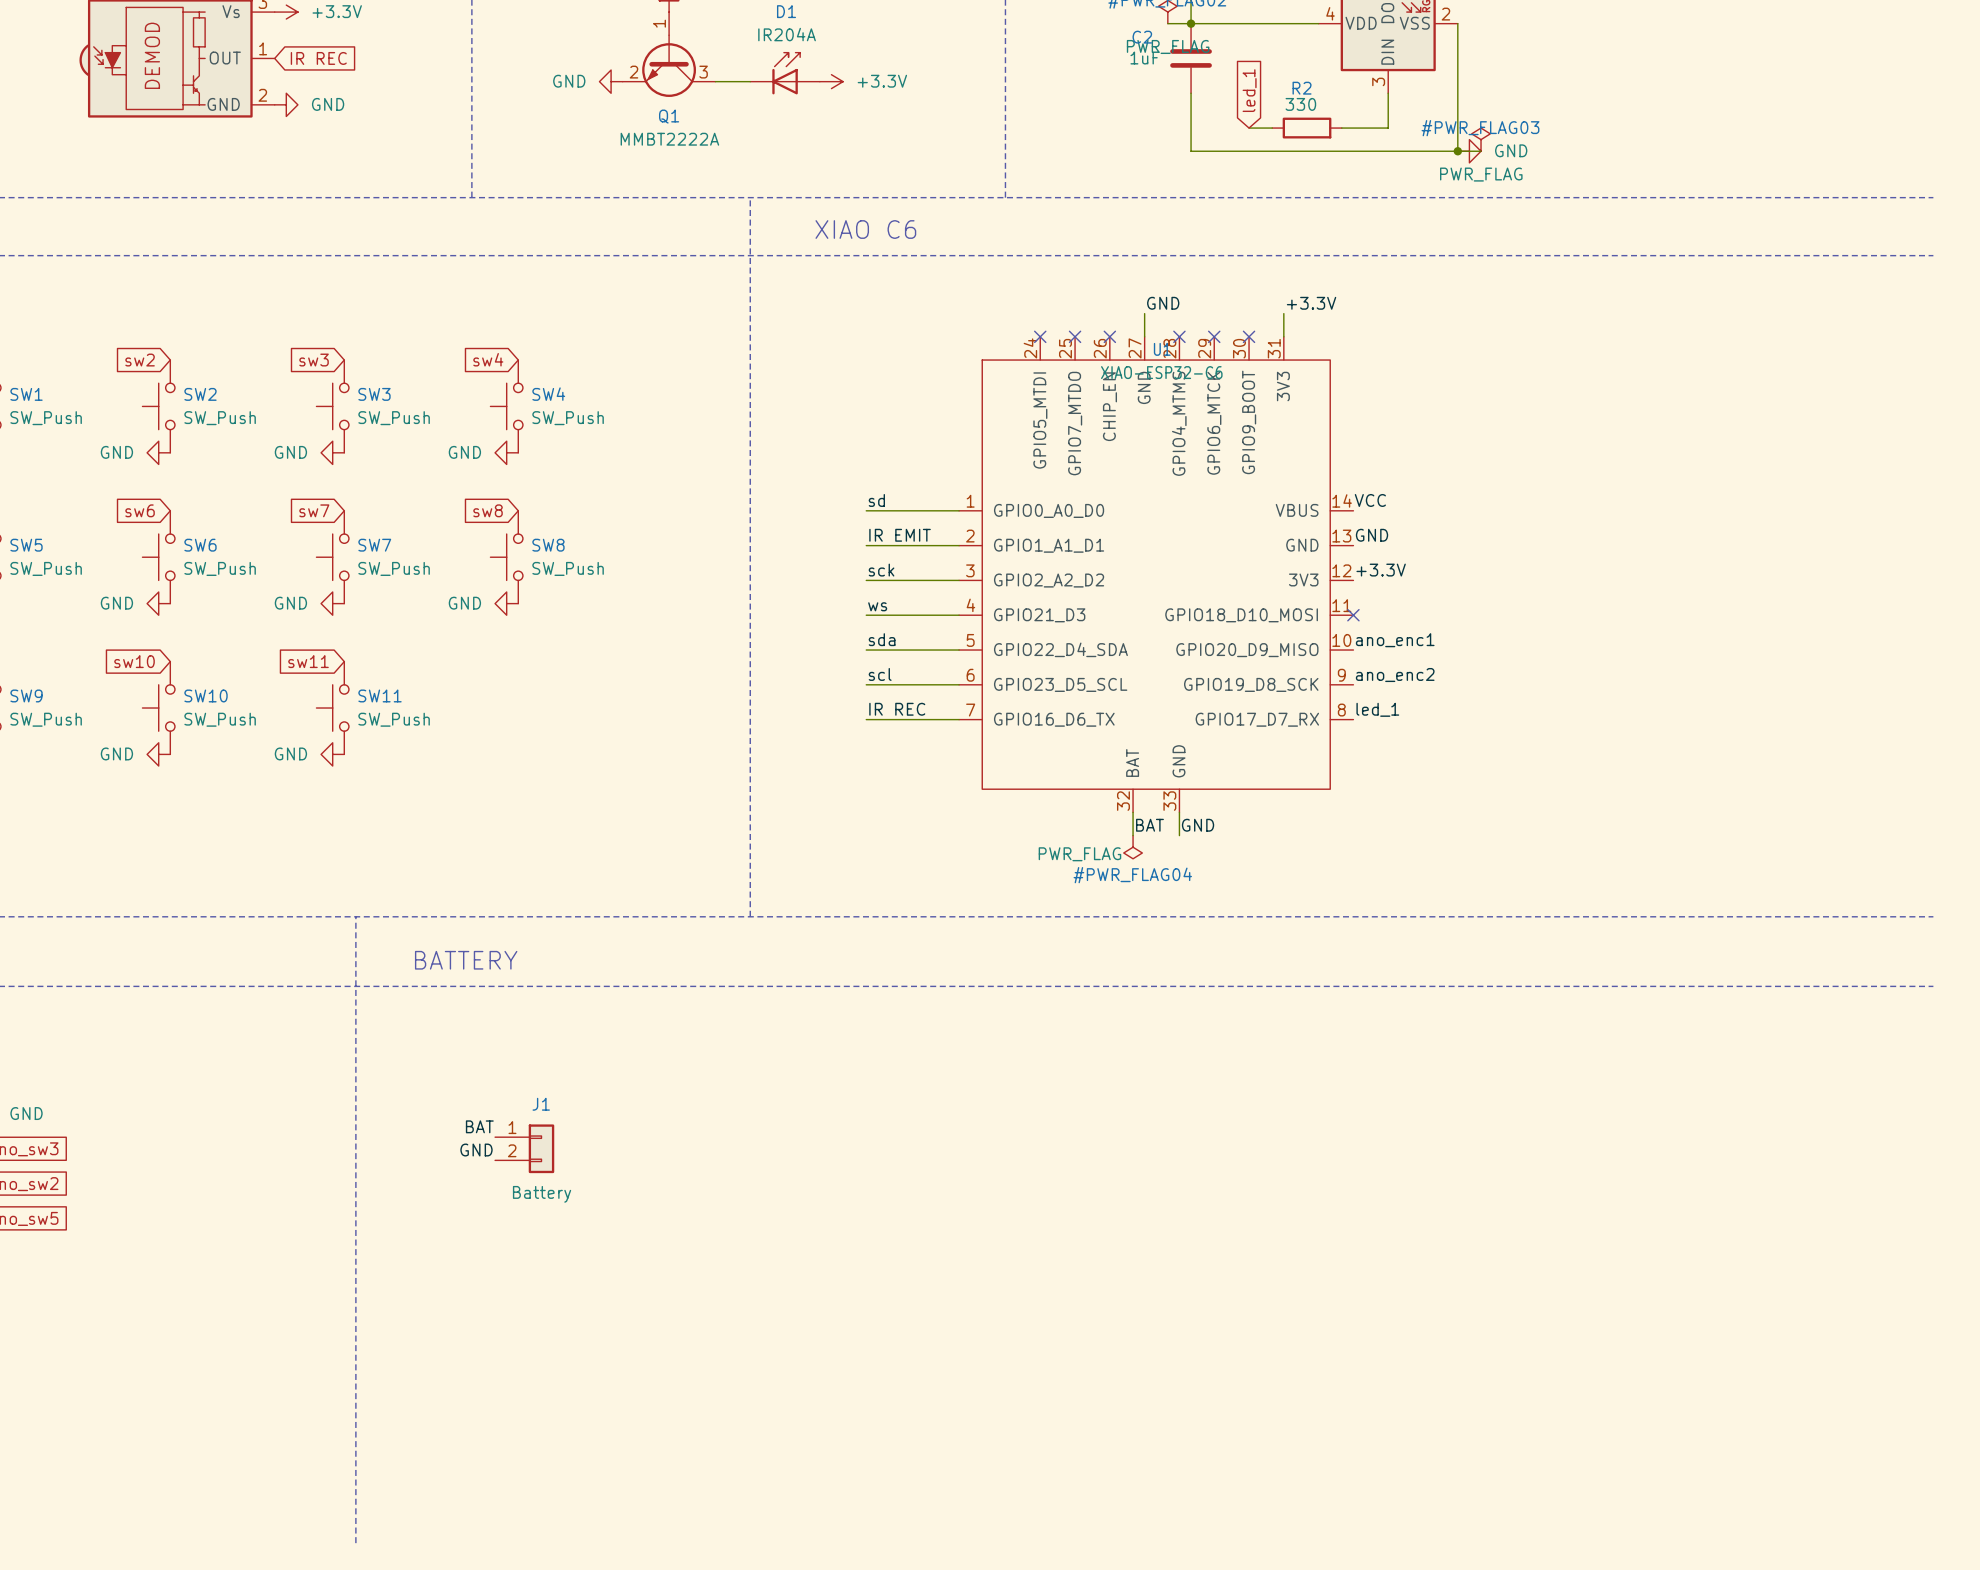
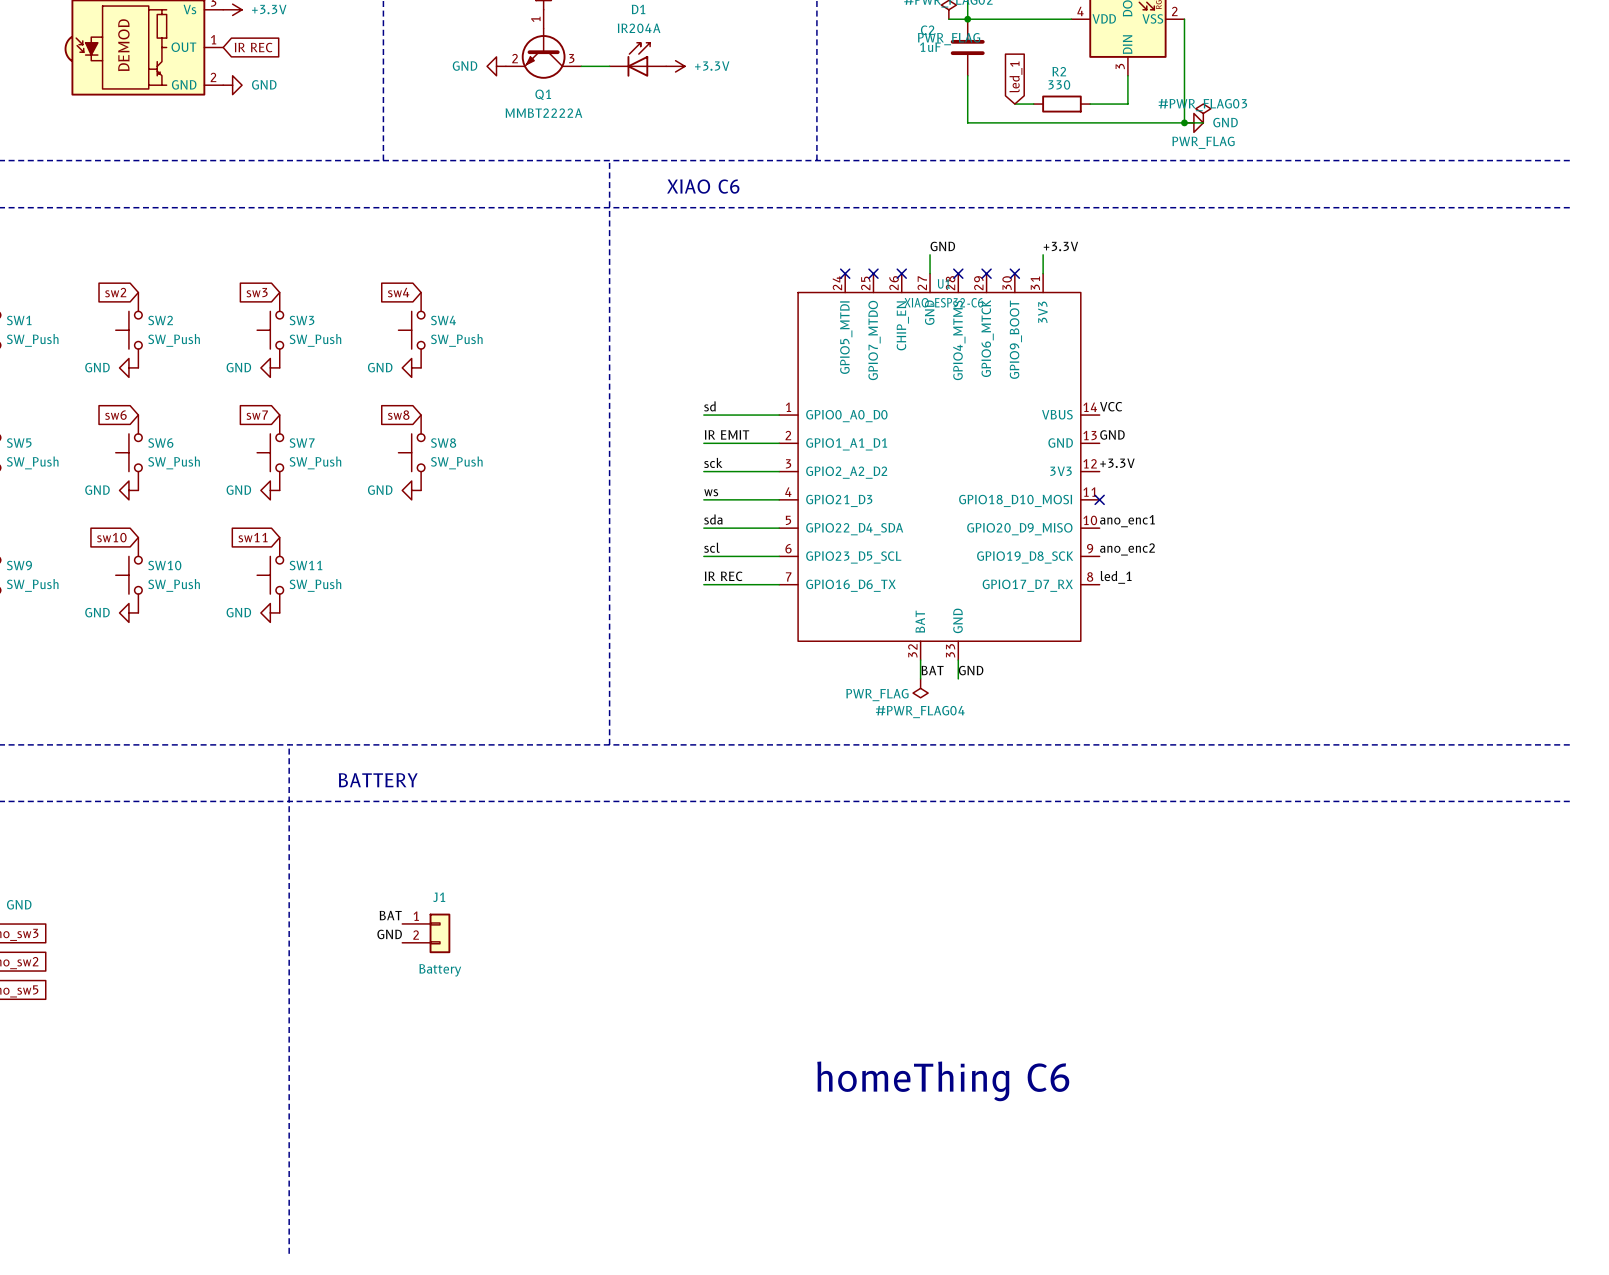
text: none -> homeThing C6 (943, 1081)

